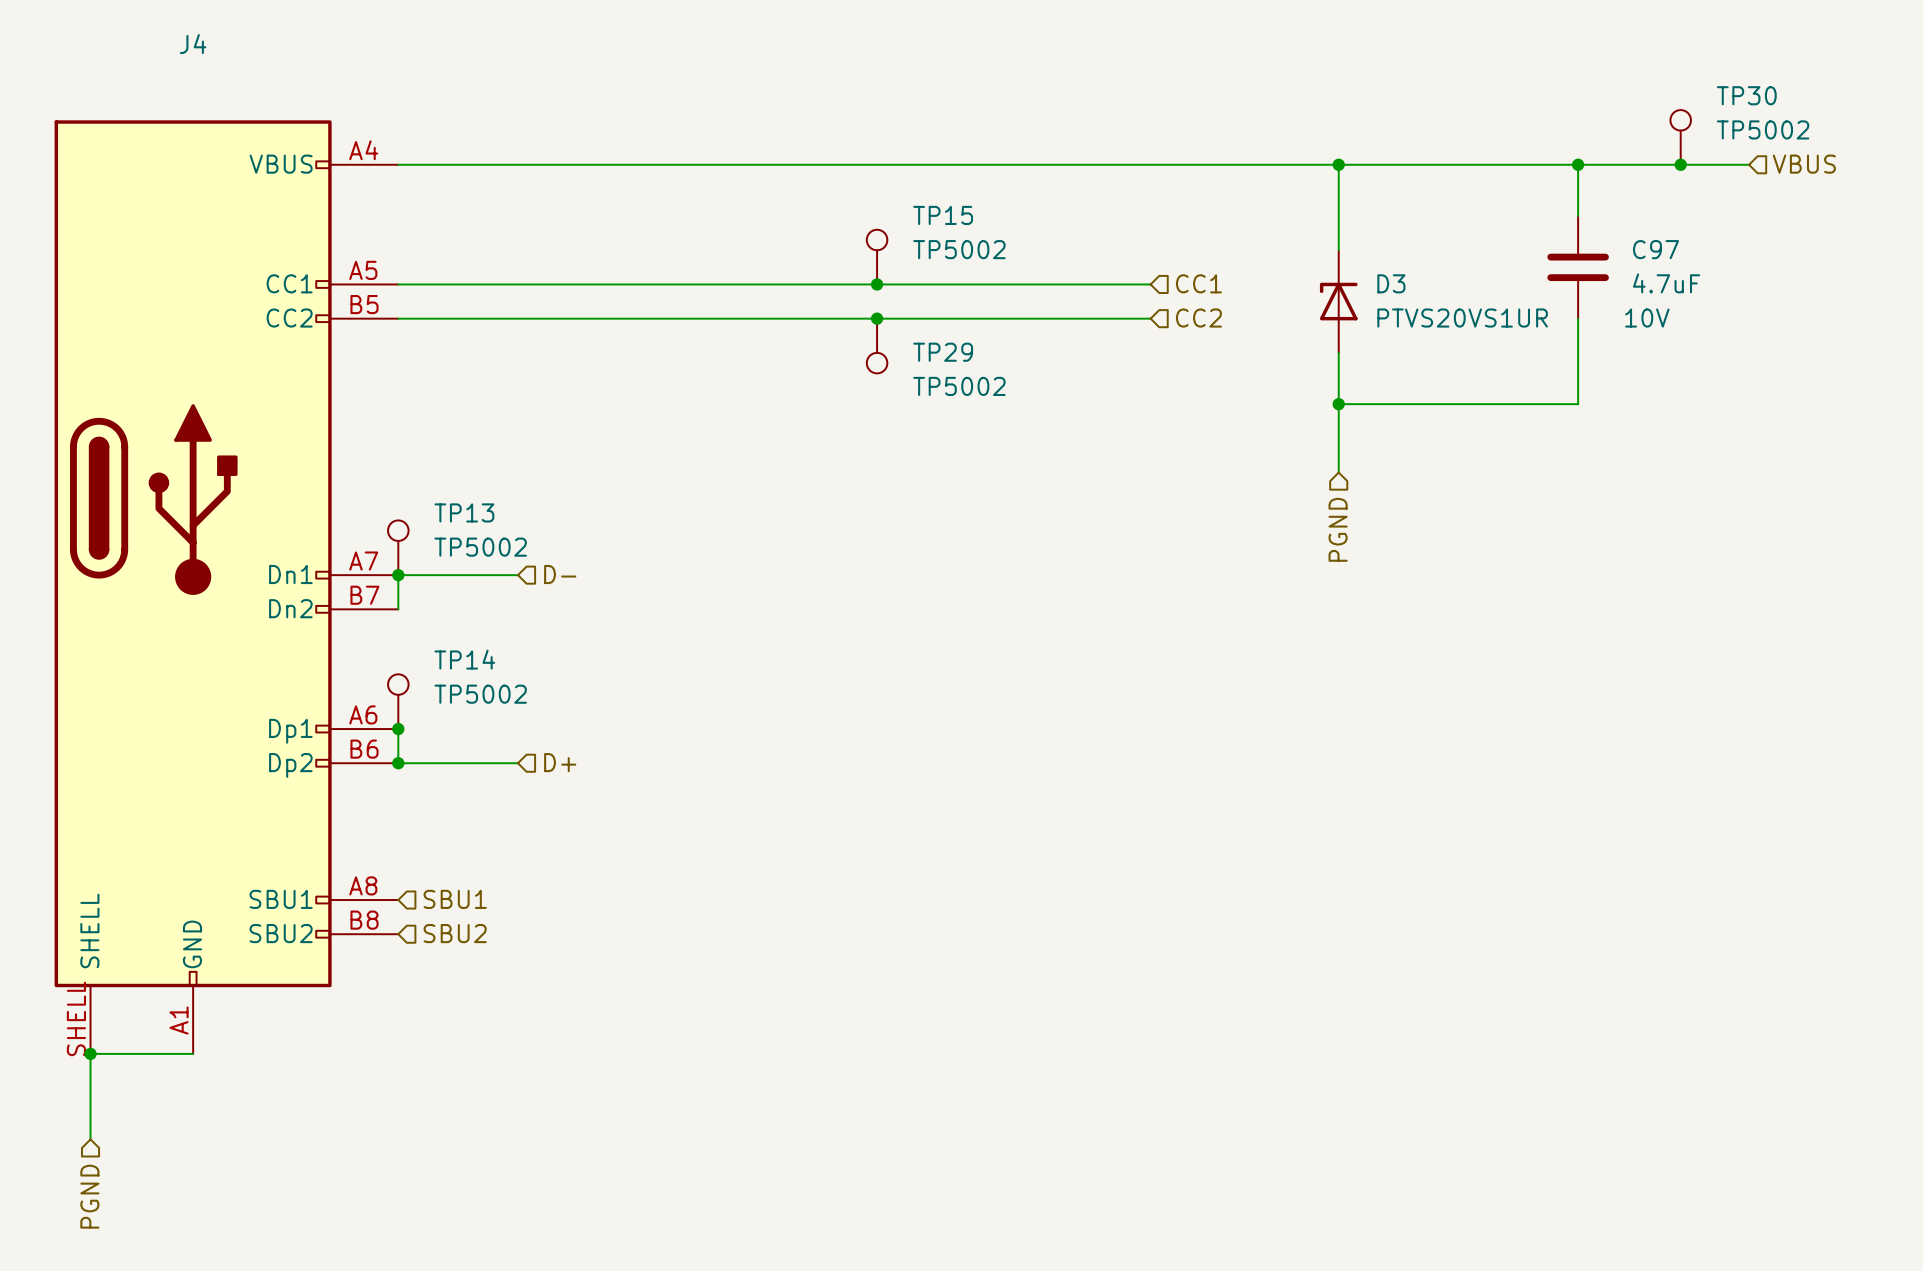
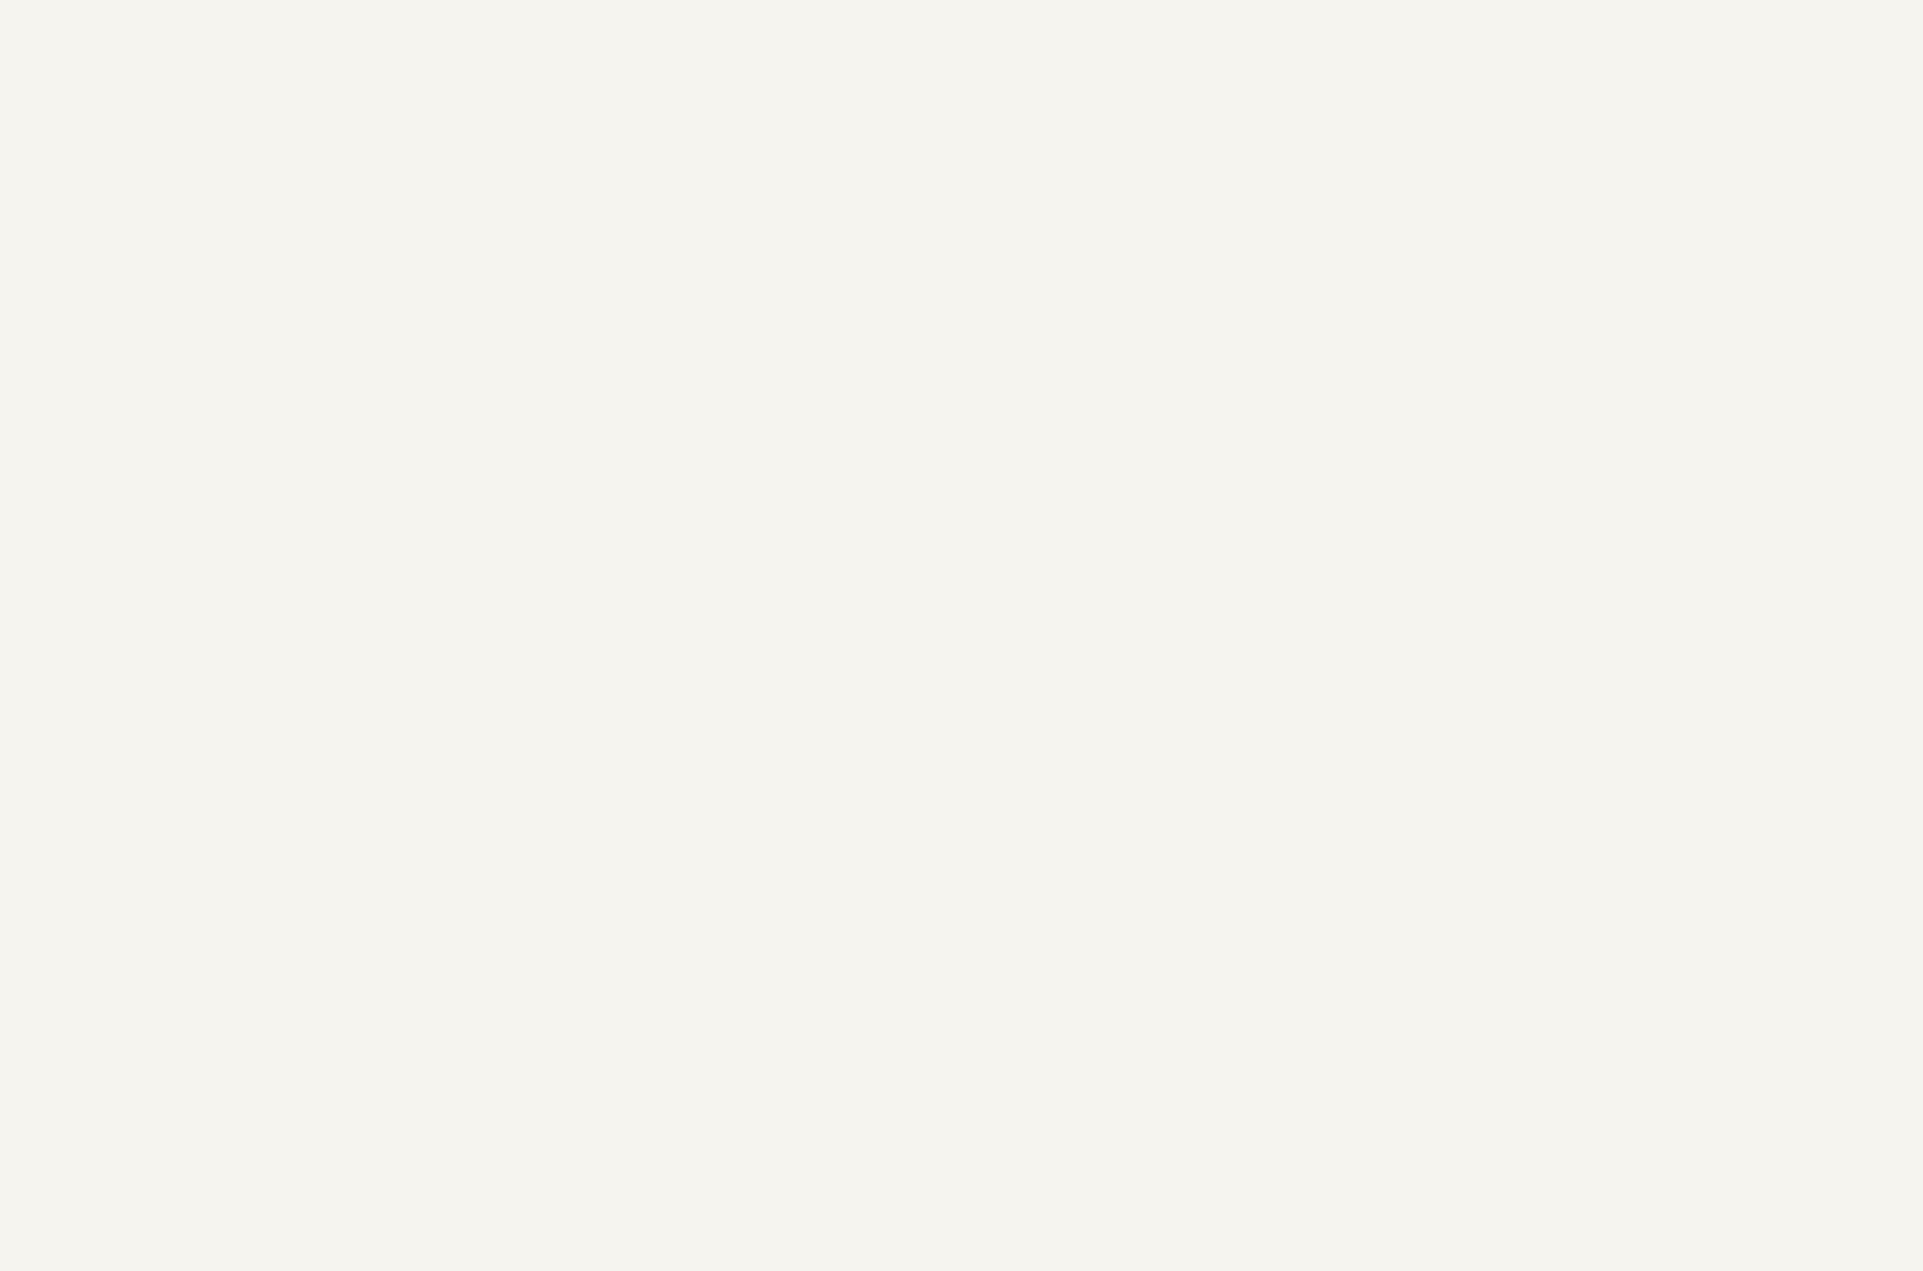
TP30: TP5002 (1680, 137) -> none
wire: (398, 164) (1749, 164) -> none
wire: (1338, 164) (1338, 250) -> none
junction: (1338, 164) -> none
wire: (1578, 164) (1578, 216) -> none
junction: (1578, 164) -> none
junction: (1680, 164) -> none
hierarchical label: VBUS (1804, 164) -> none
TP15: TP5002 (877, 257) -> none
C97: 4.7uF (1578, 267) -> none
hierarchical label: CC1 (1198, 283) -> none
wire: (398, 284) (1150, 284) -> none
junction: (877, 284) -> none
D3: PTVS20VS1UR (1338, 301) -> none
wire: (398, 318) (1150, 318) -> none
junction: (877, 318) -> none
hierarchical label: CC2 (1198, 318) -> none
wire: (1578, 318) (1578, 404) (1338, 404) -> none
TP29: TP5002 (877, 346) -> none
wire: (1338, 352) (1338, 472) -> none
junction: (1338, 404) -> none
hierarchical label: PGND (1338, 529) -> none
TP13: TP5002 (398, 547) -> none
hierarchical label: D- (560, 574) -> none
junction: (398, 575) -> none
wire: (518, 575) (398, 575) (398, 609) -> none
J4: (226, 587) -> none
TP14: TP5002 (398, 701) -> none
wire: (398, 729) (398, 763) (518, 763) -> none
junction: (398, 729) -> none
hierarchical label: D+ (560, 762) -> none
junction: (398, 763) -> none
hierarchical label: SBU1 (455, 899) -> none
hierarchical label: SBU2 (455, 933) -> none
junction: (90, 1053) -> none
wire: (193, 1053) (90, 1053) (90, 1139) -> none
hierarchical label: PGND (89, 1196) -> none

